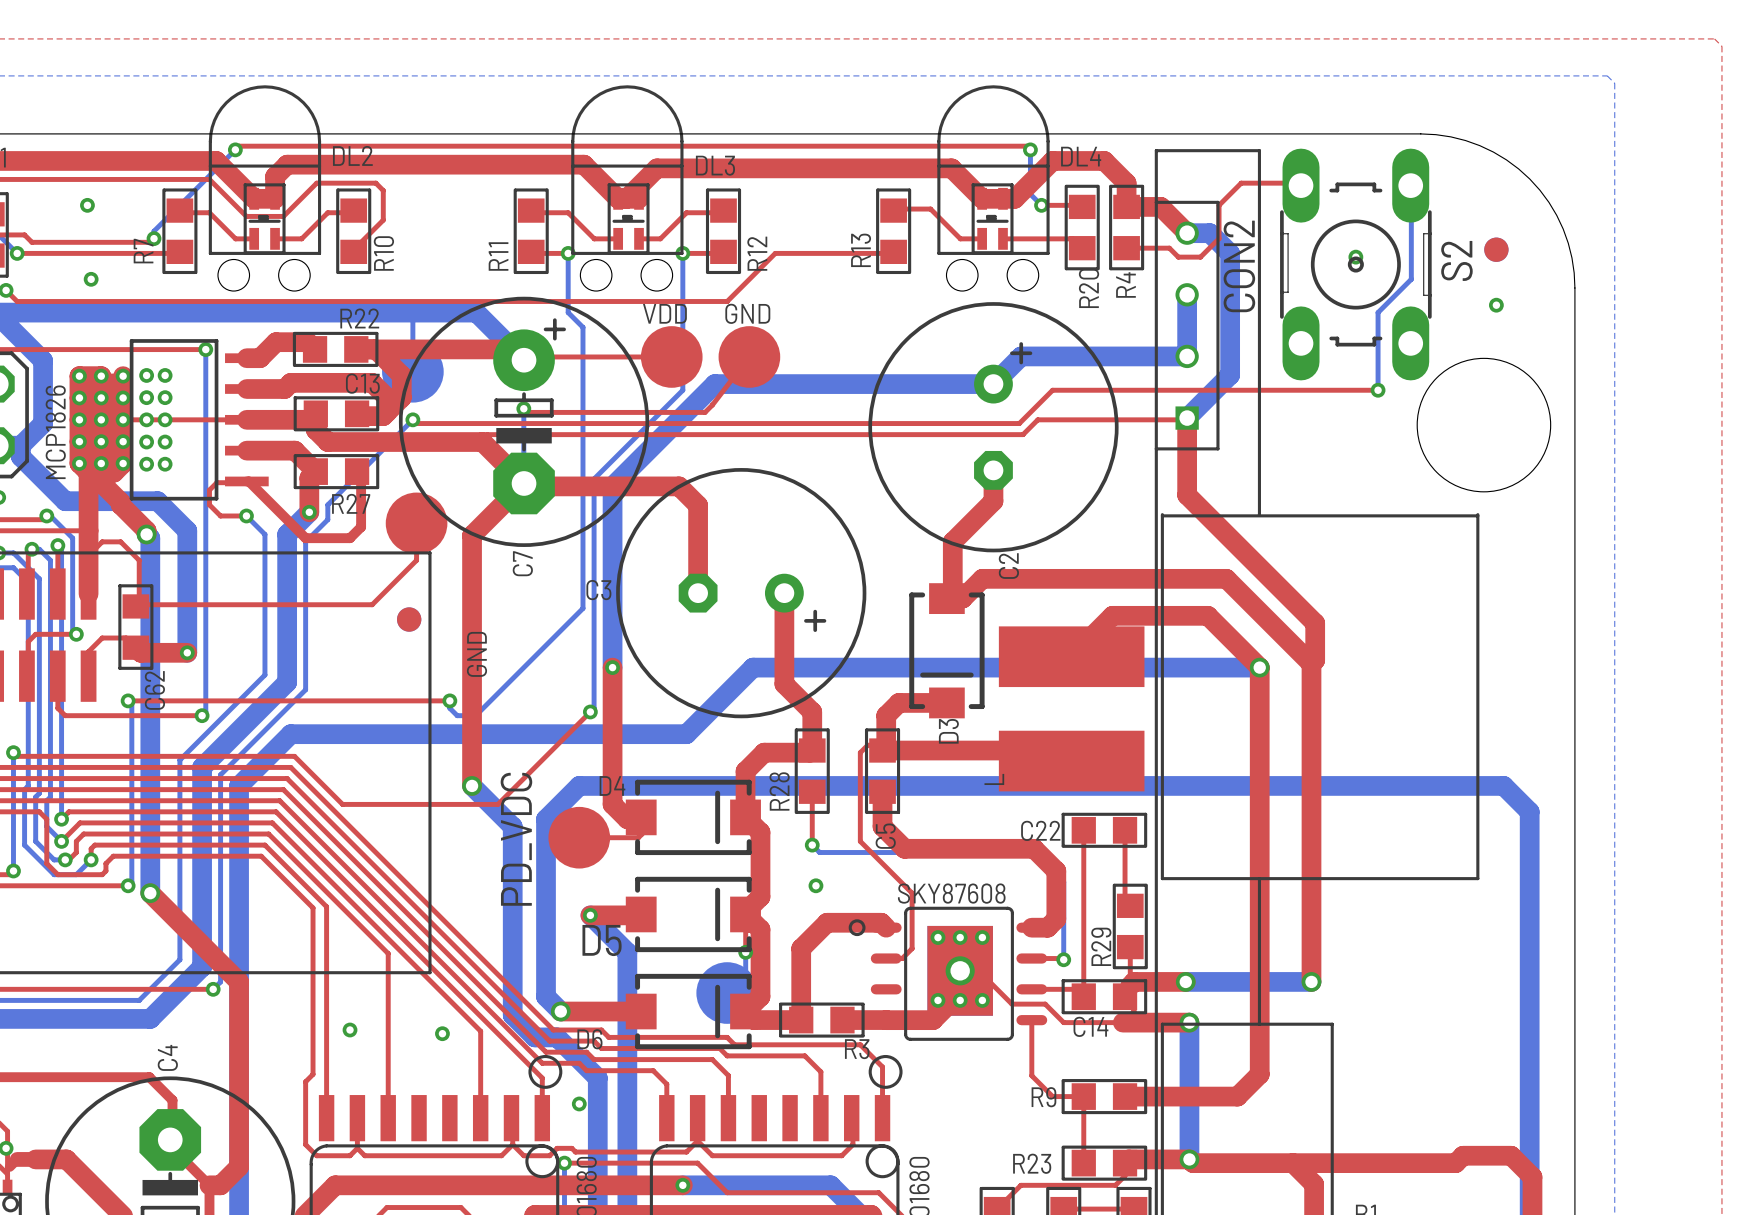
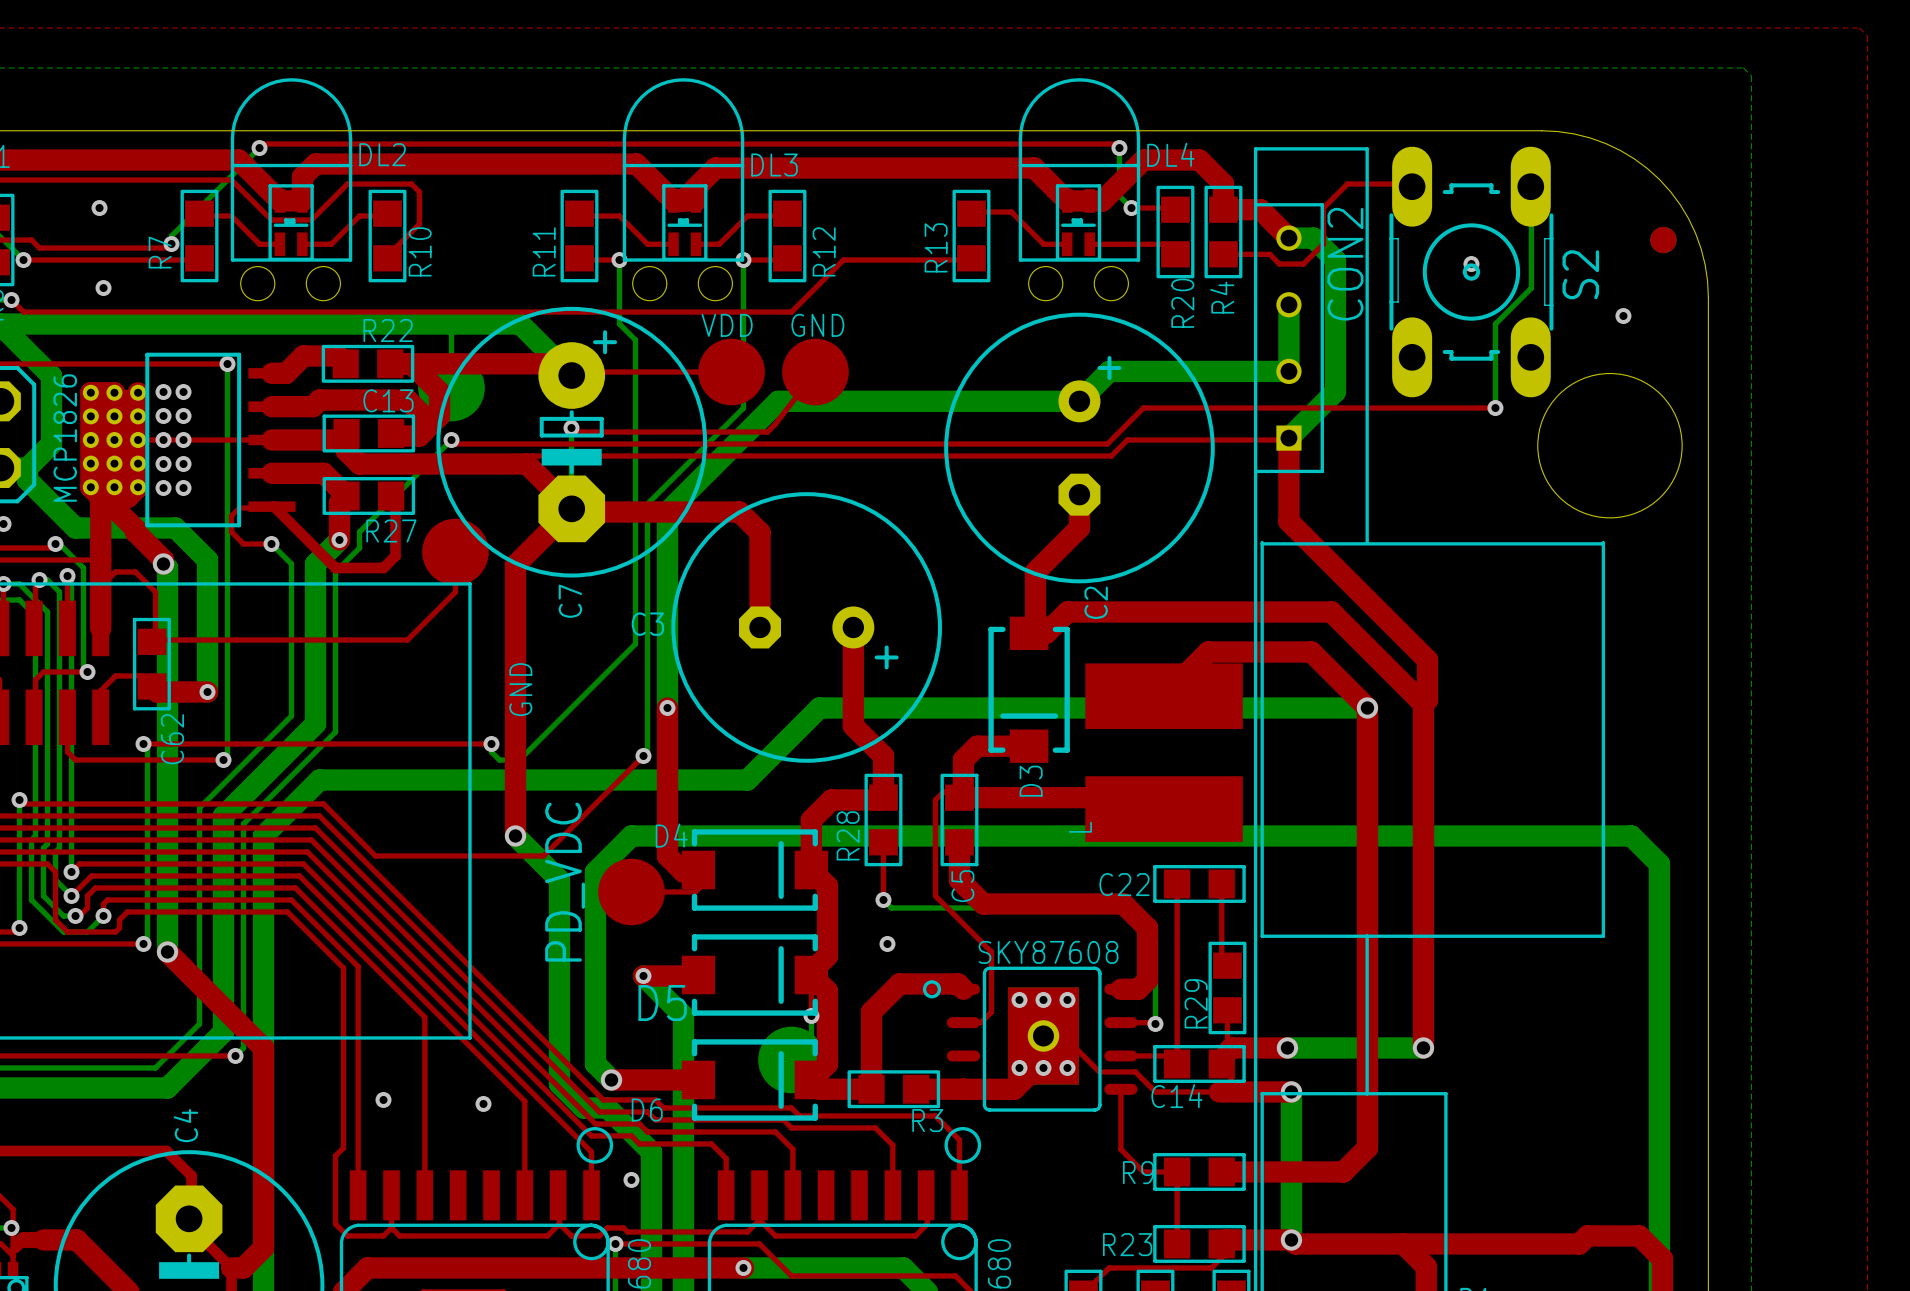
part position: (1496, 249) -> (1663, 240)
part: (409, 619) -> none

